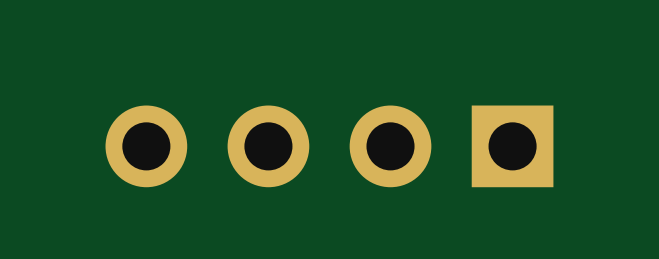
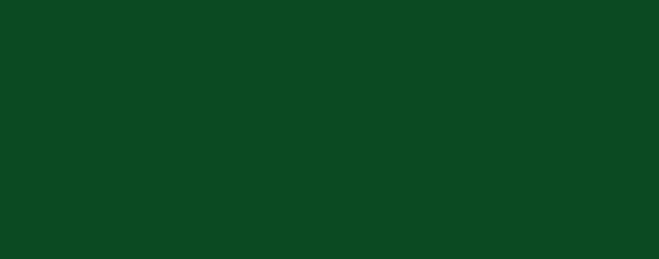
part: (329, 146) -> none

